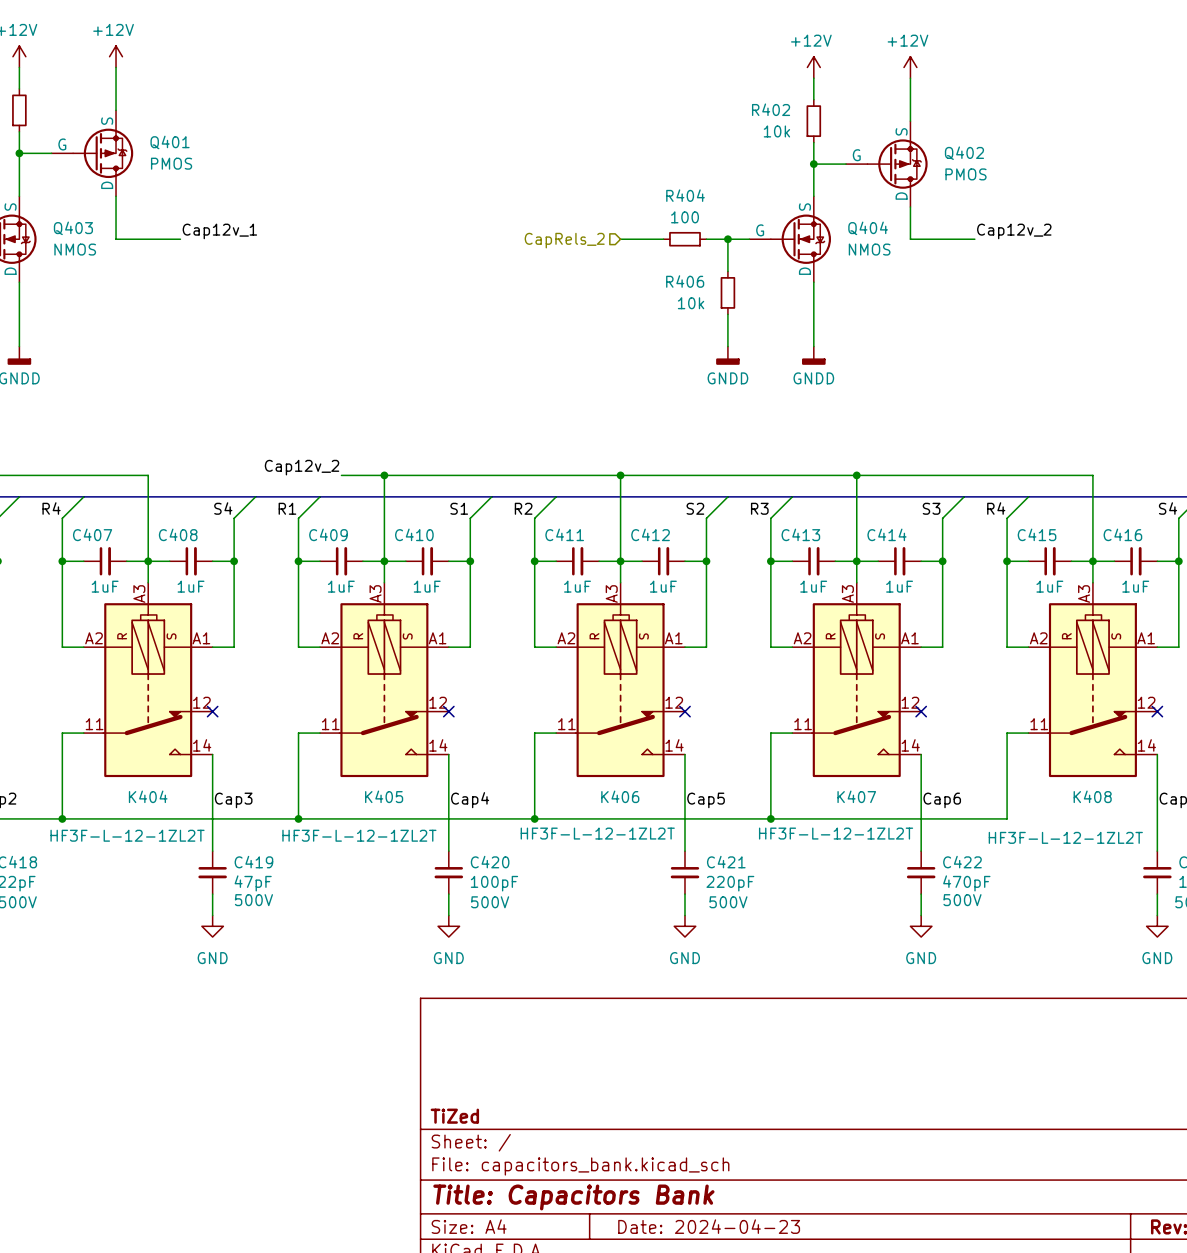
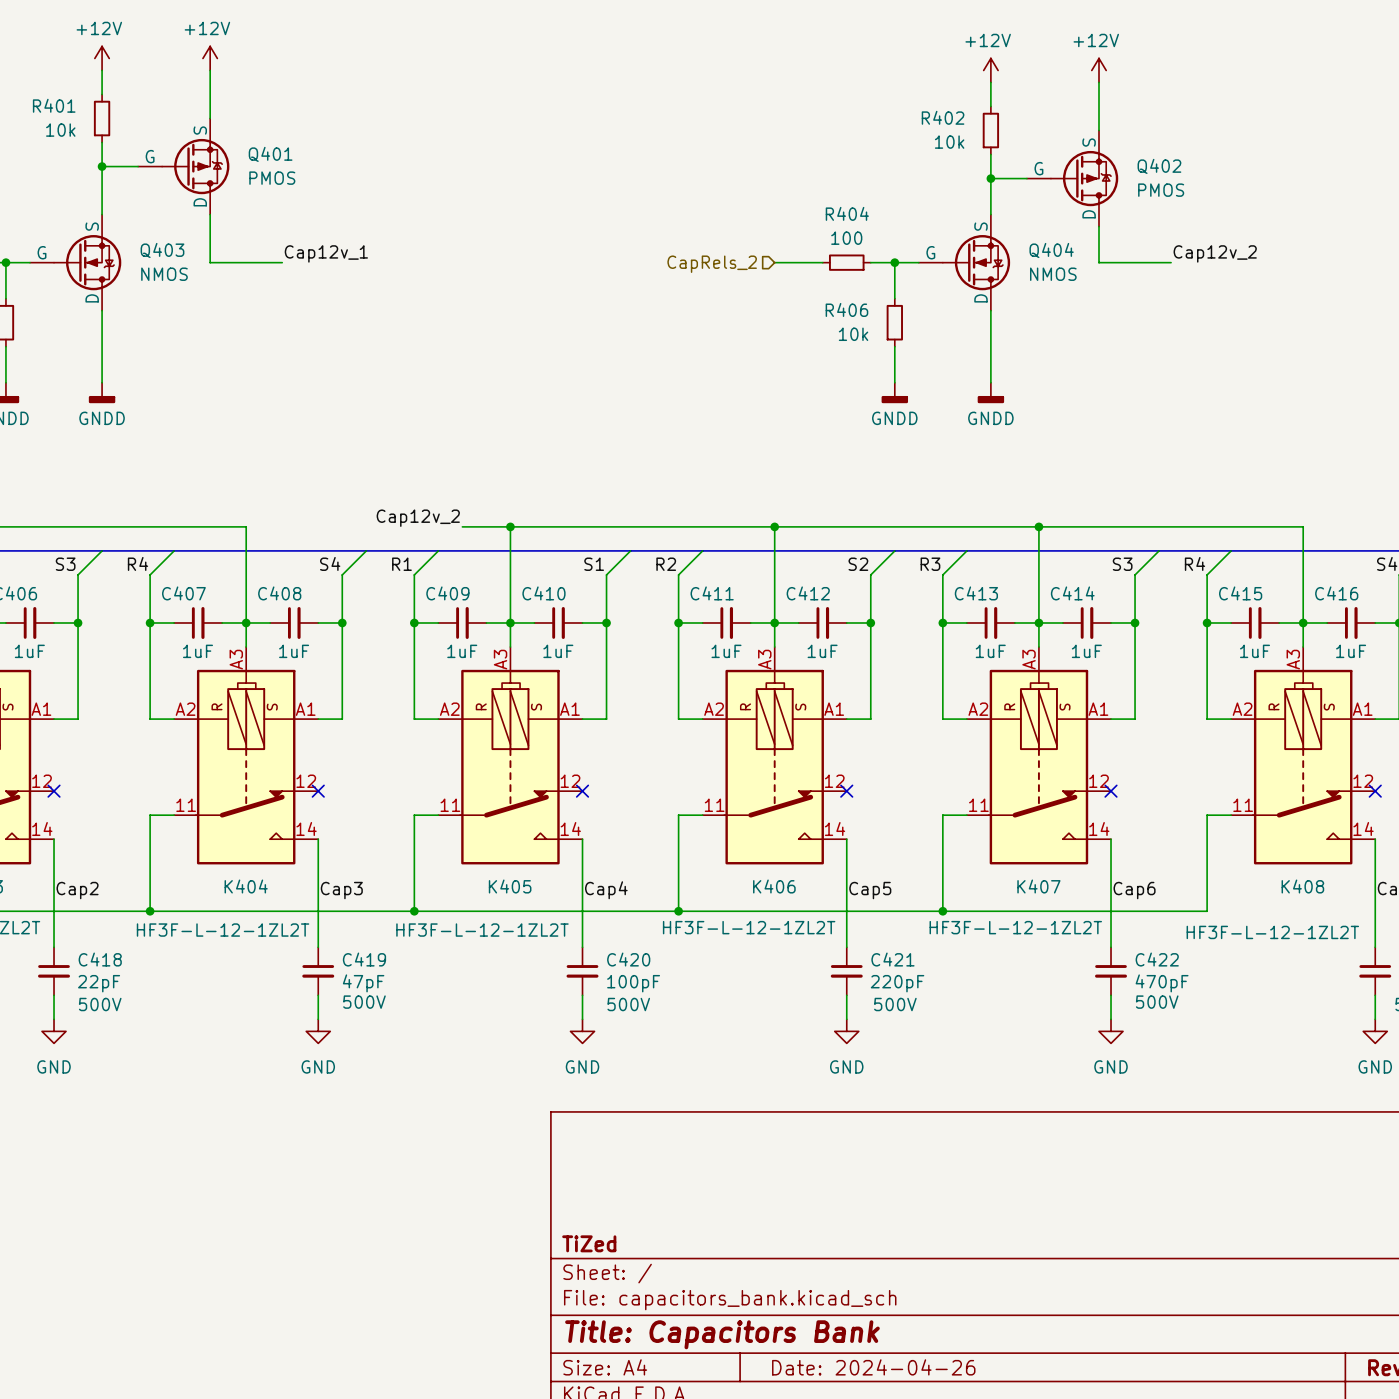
title block: Date: 2024-04-23 (709, 1226) -> Date: 2024-04-26 (873, 1367)

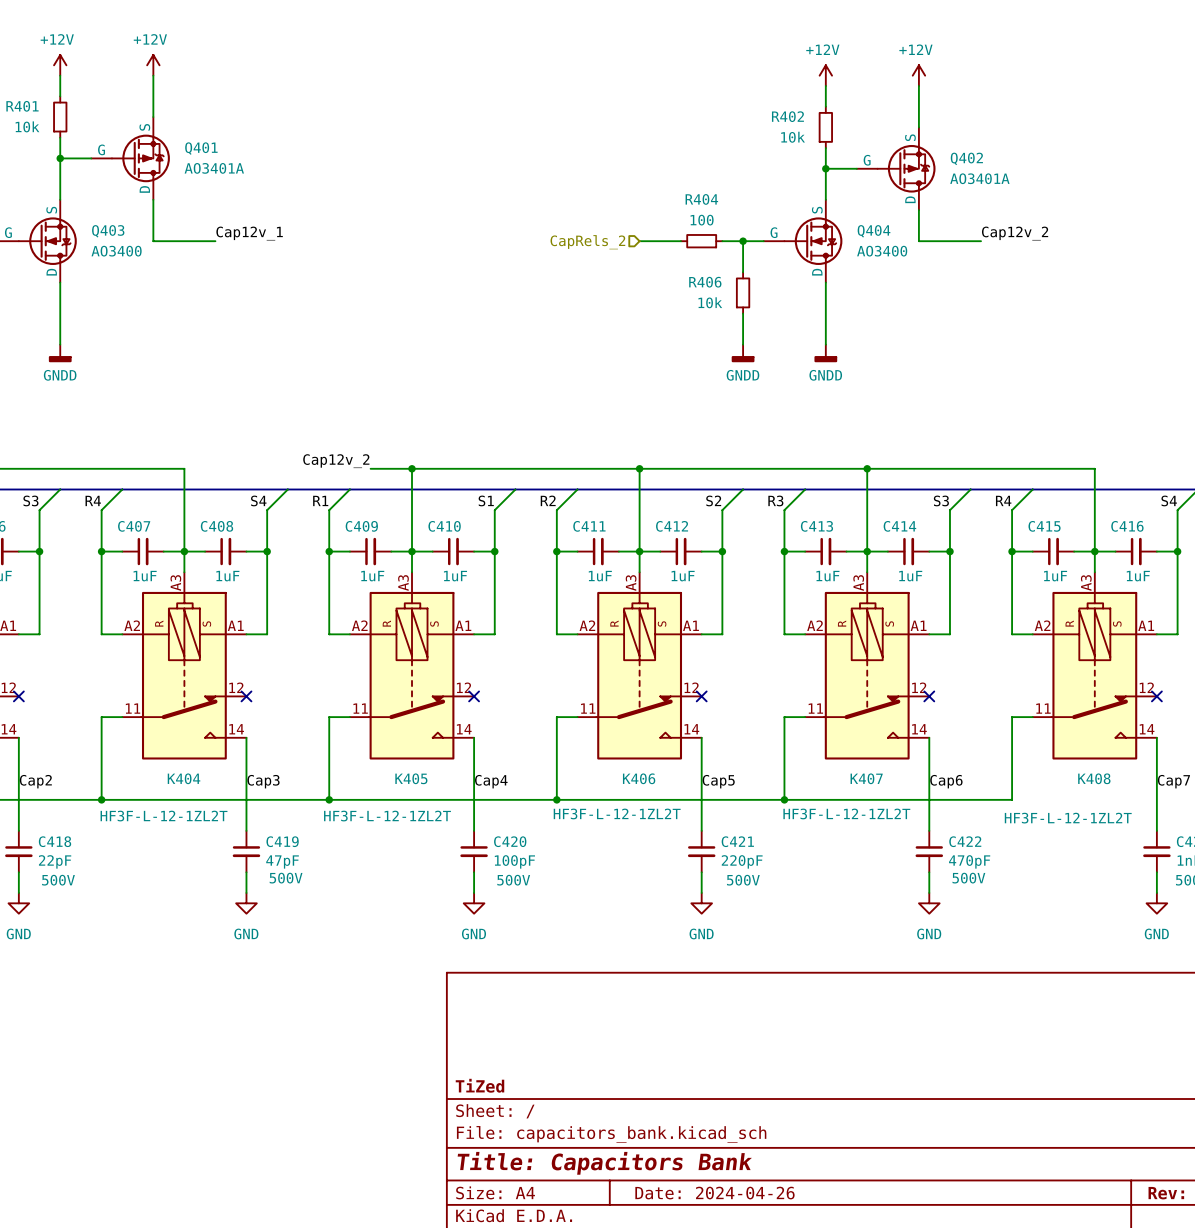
Q401 value: PMOS (272, 178) -> AO3401A (214, 168)
Q402 value: PMOS (1161, 190) -> AO3401A (979, 178)
Q403 value: NMOS (164, 274) -> AO3400 (116, 251)
Q404 value: NMOS (1053, 274) -> AO3400 (882, 251)

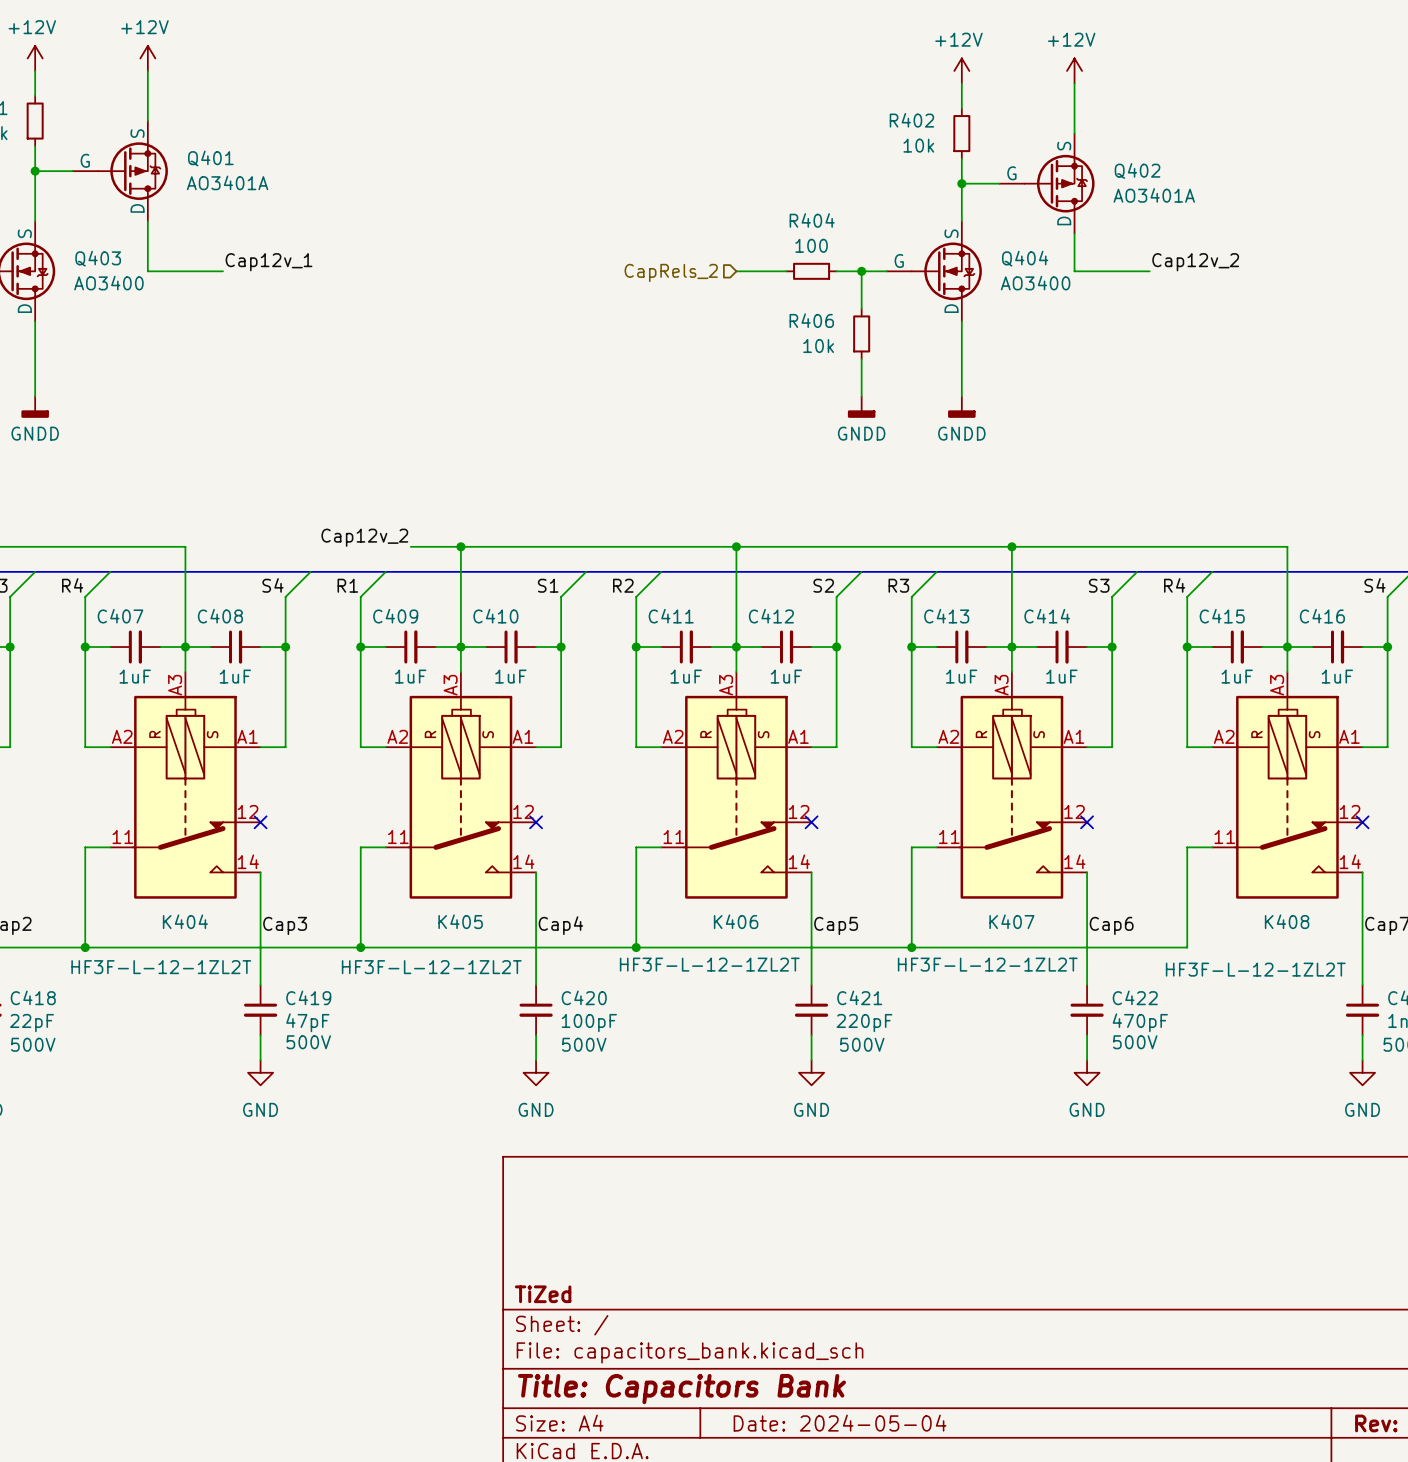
title block: Date: 2024-04-26 (714, 1193) -> Date: 2024-05-04 (840, 1423)

